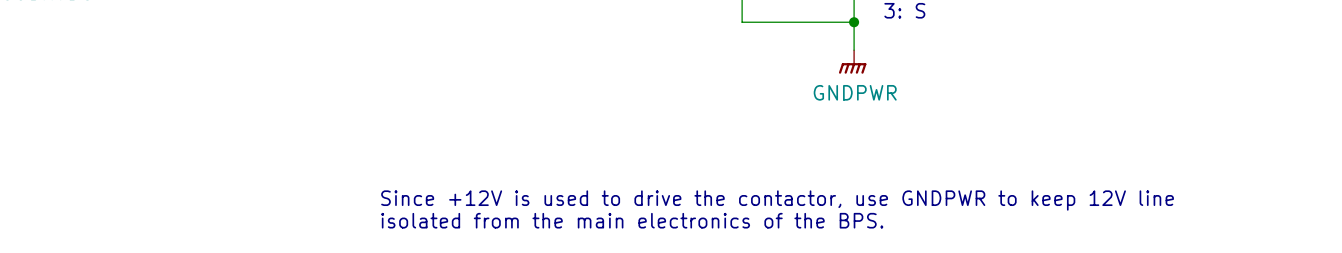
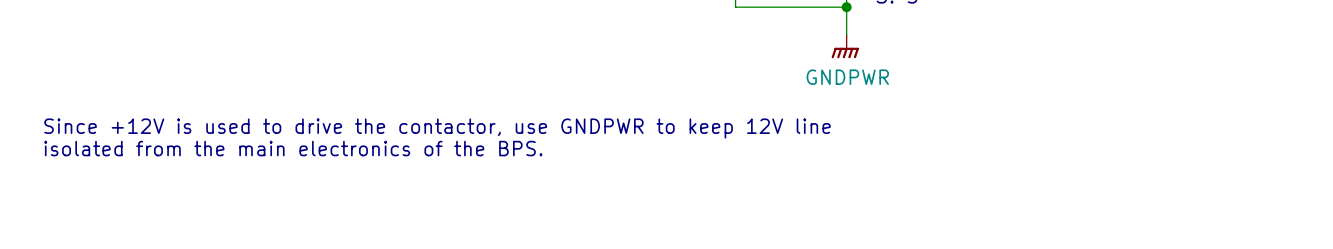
text: none -> Since +12V is used to drive the contactor, use GNDPWR to keep 12V line (437, 128)
text: none -> isolated from the main electronics of the BPS. (293, 148)
text: Since +12V is used to drive the contactor, use GNDPWR to keep 12V line (777, 200) -> none
text: isolated from the main electronics of the BPS. (632, 220) -> none

